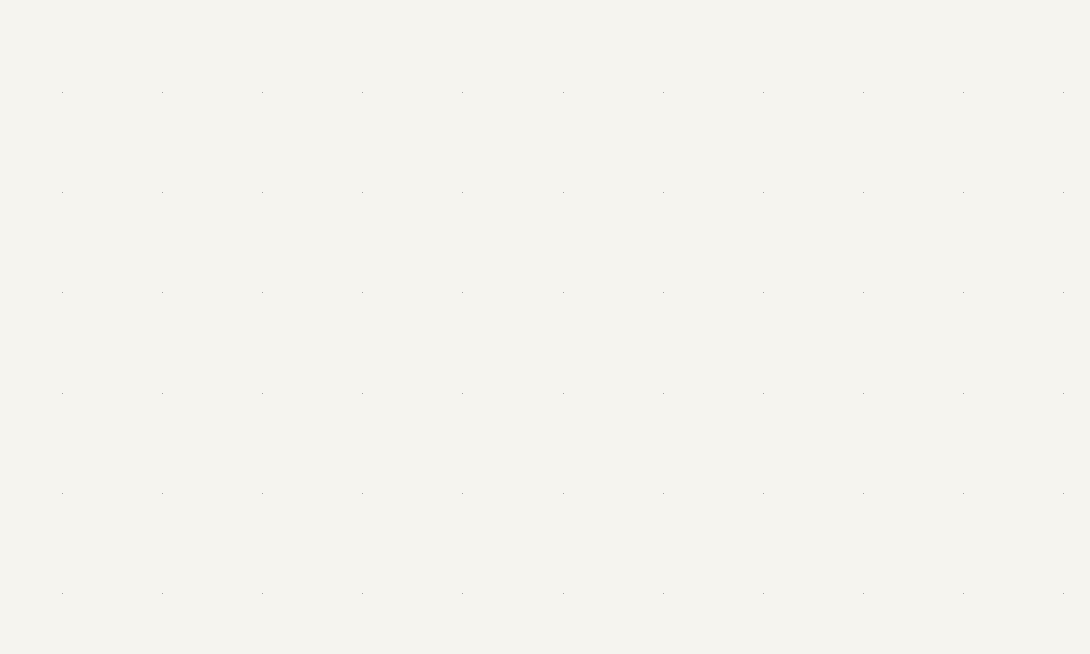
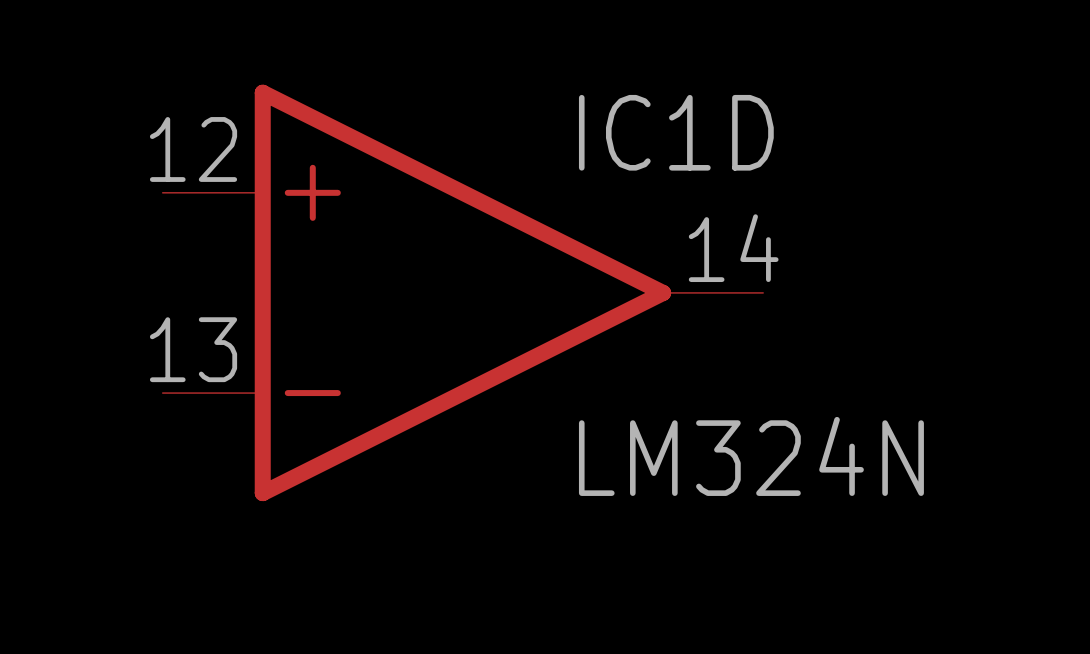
IC1D: none -> LM324N (462, 292)

